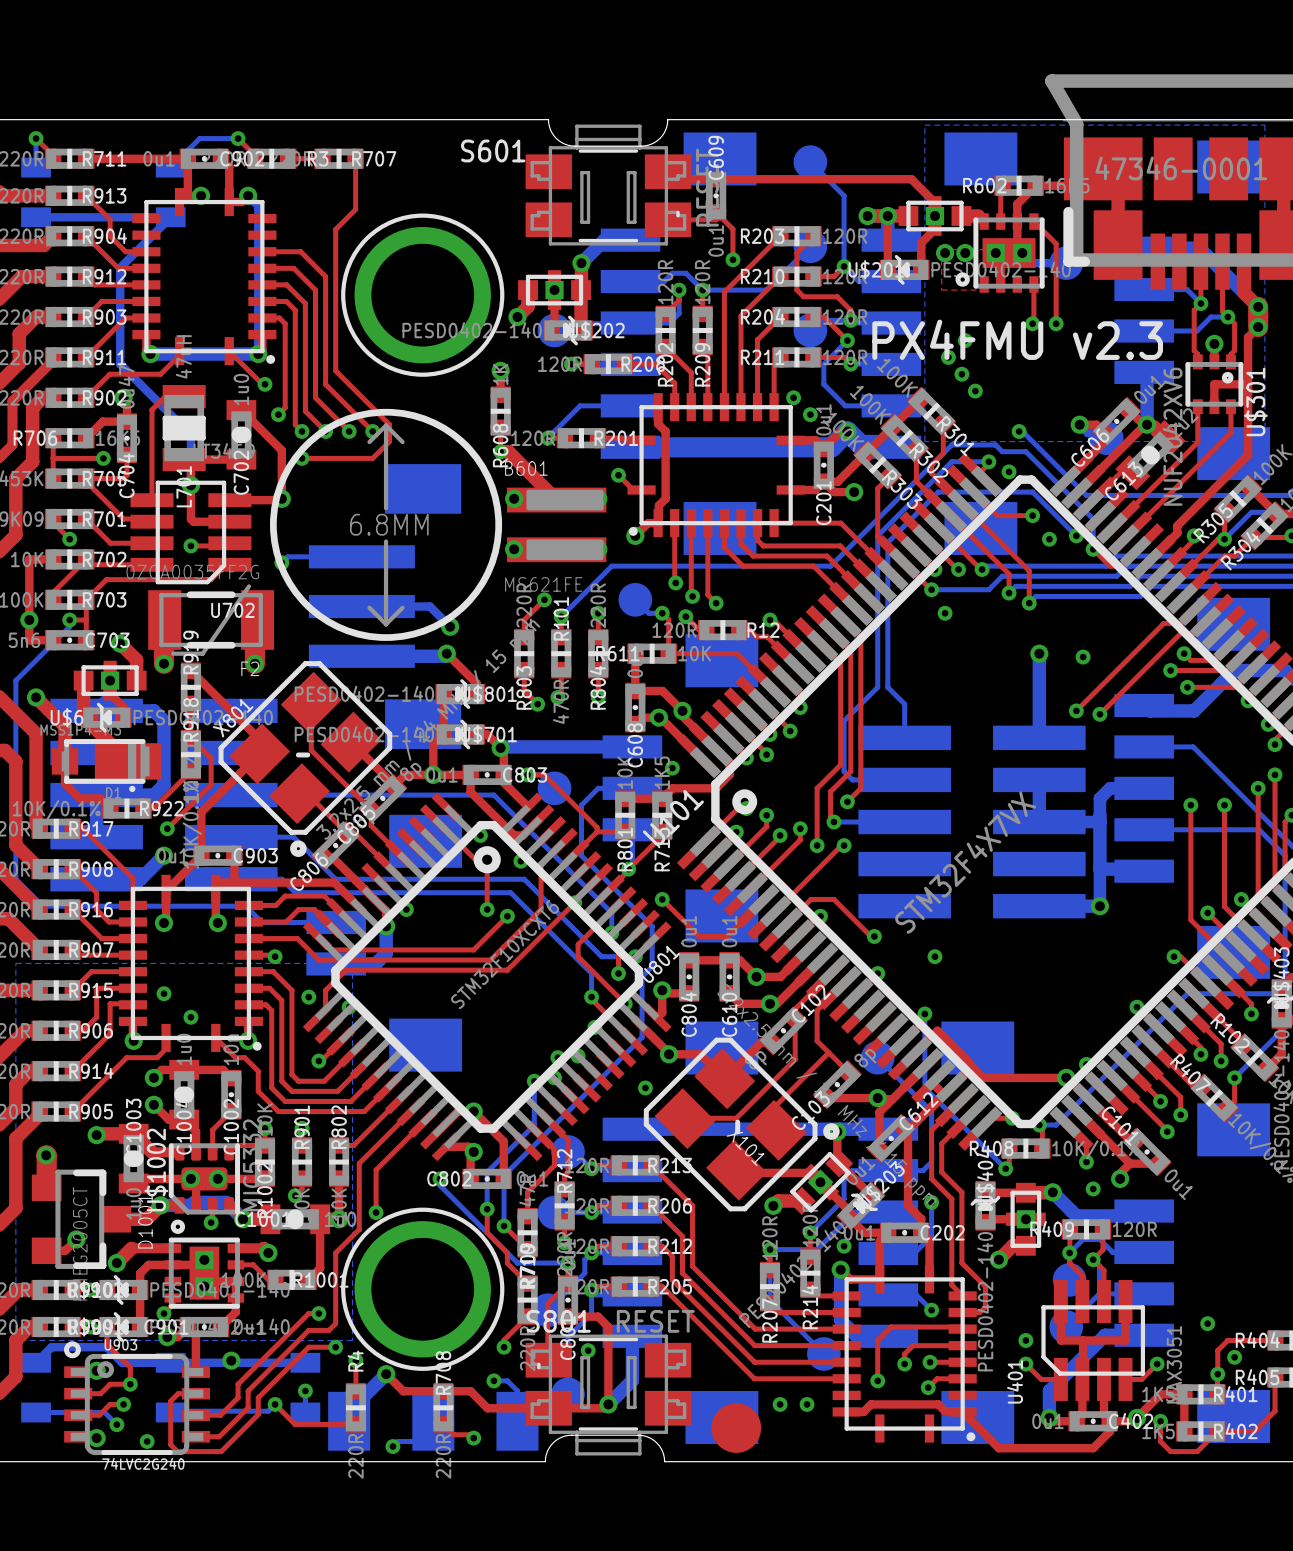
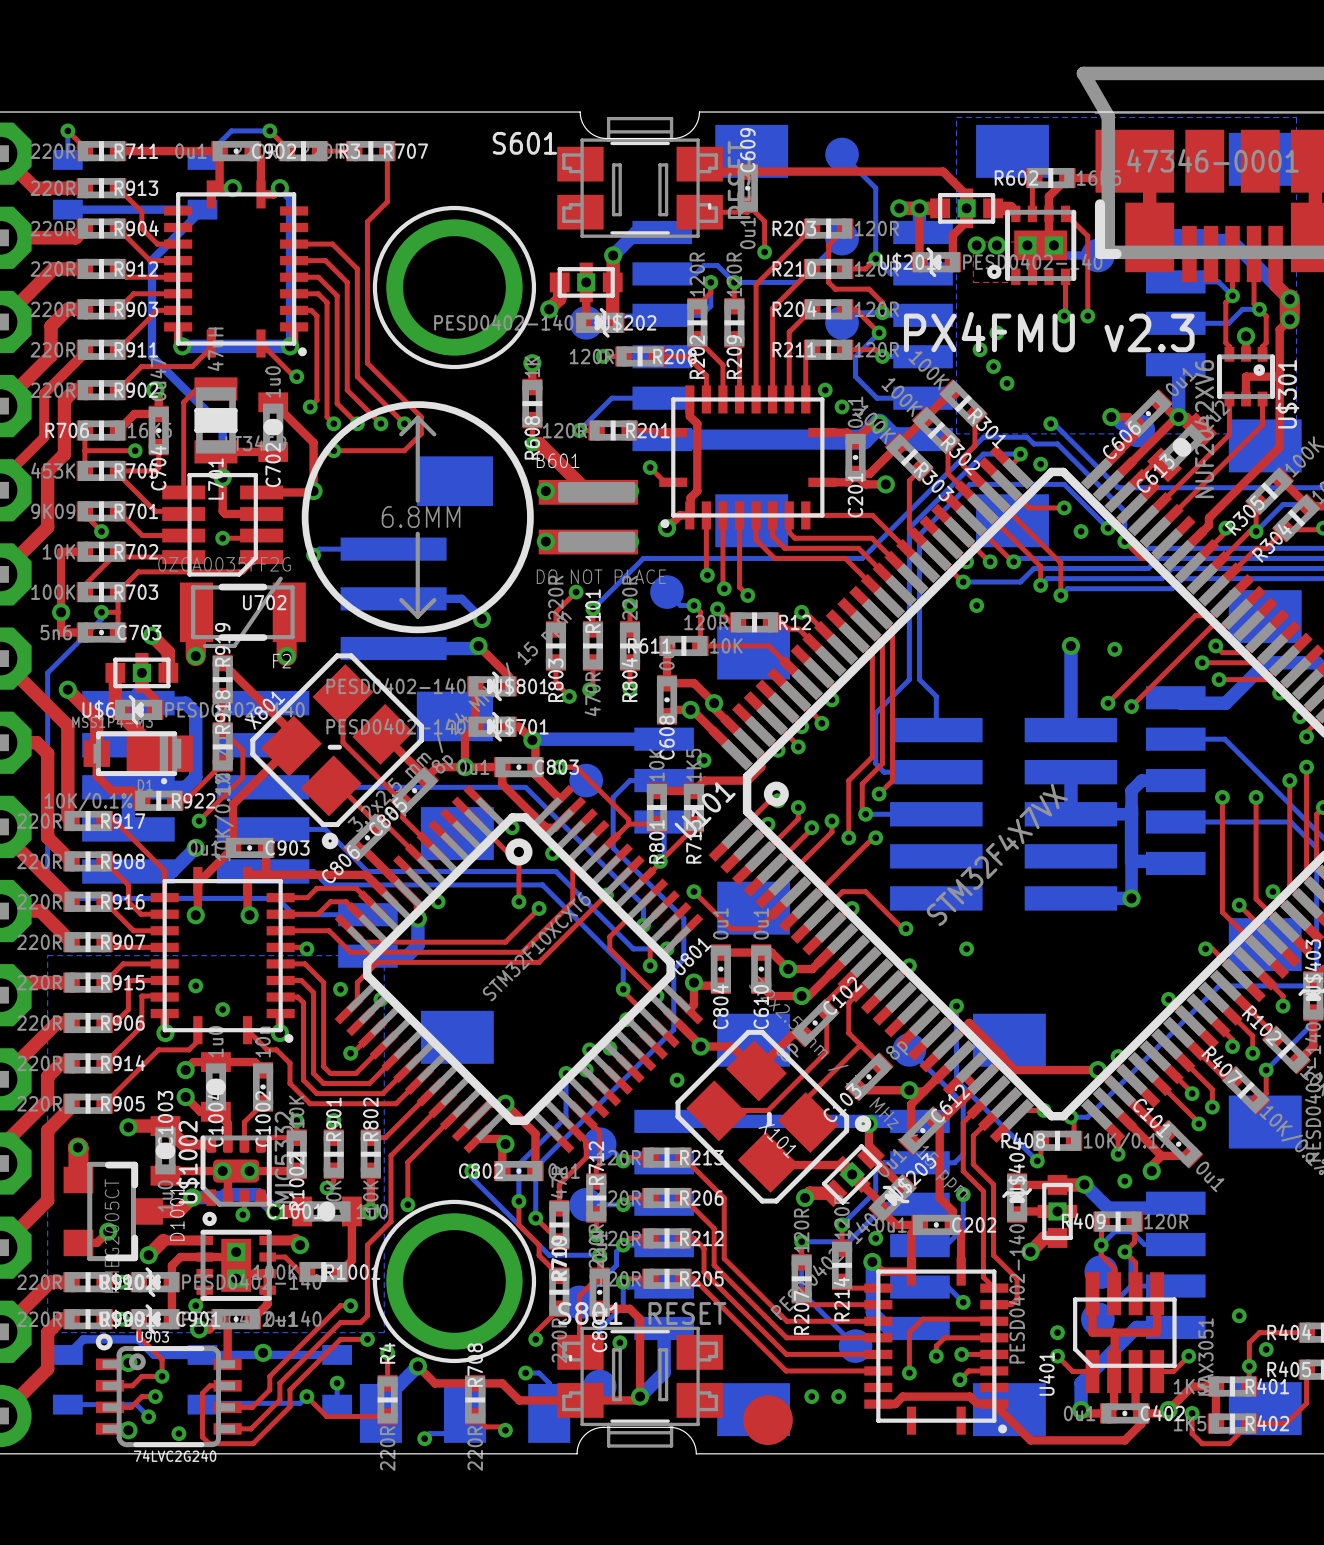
B601 value: MS621FE (543, 584) -> DO NOT PLACE (601, 576)

